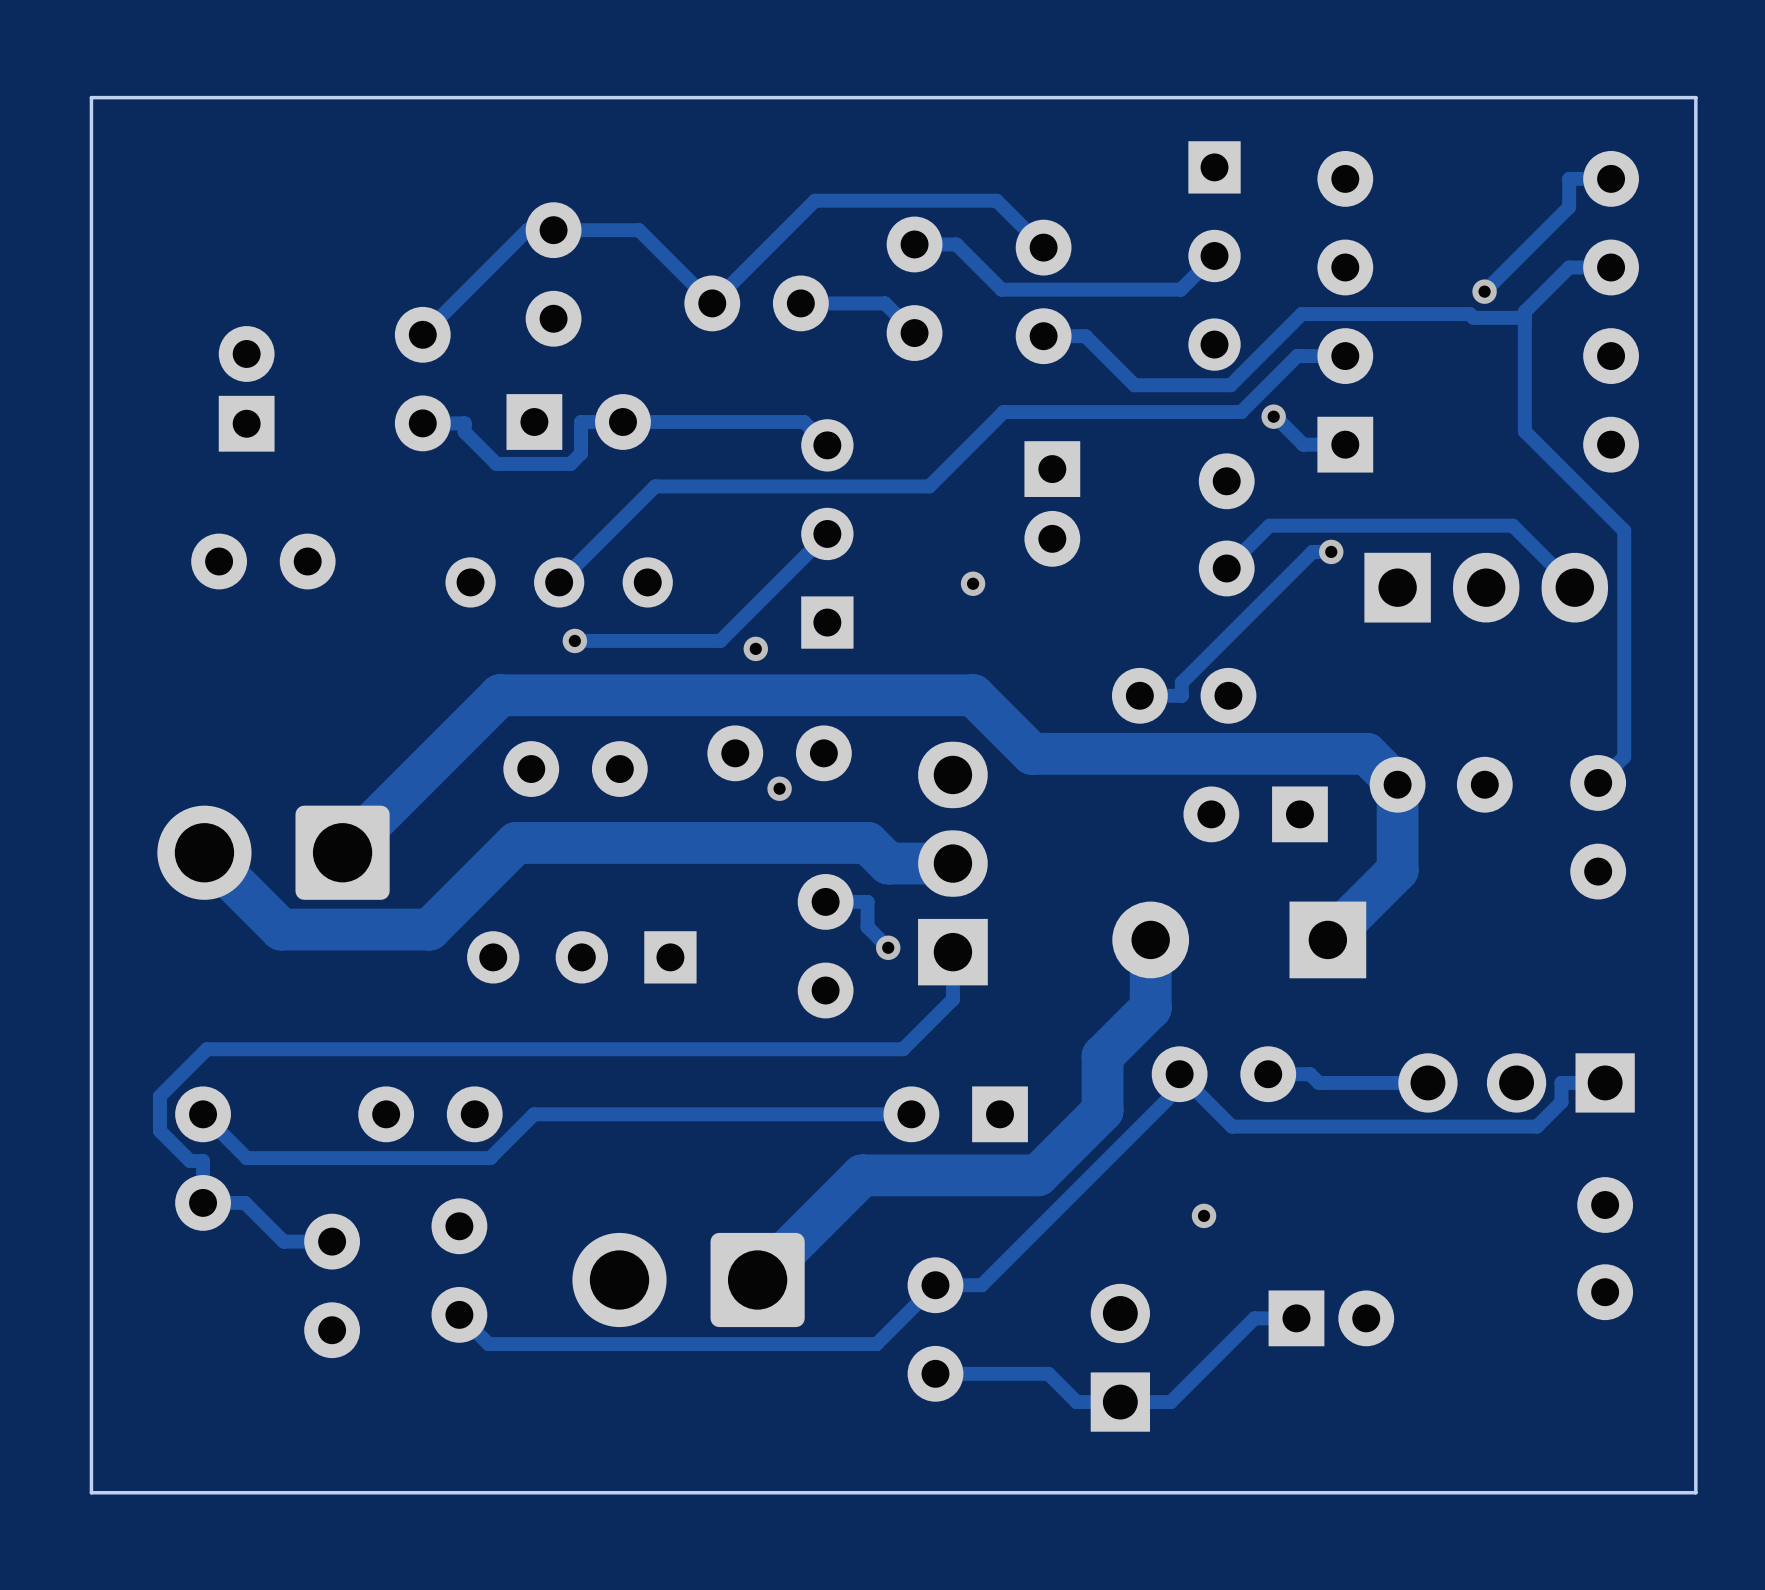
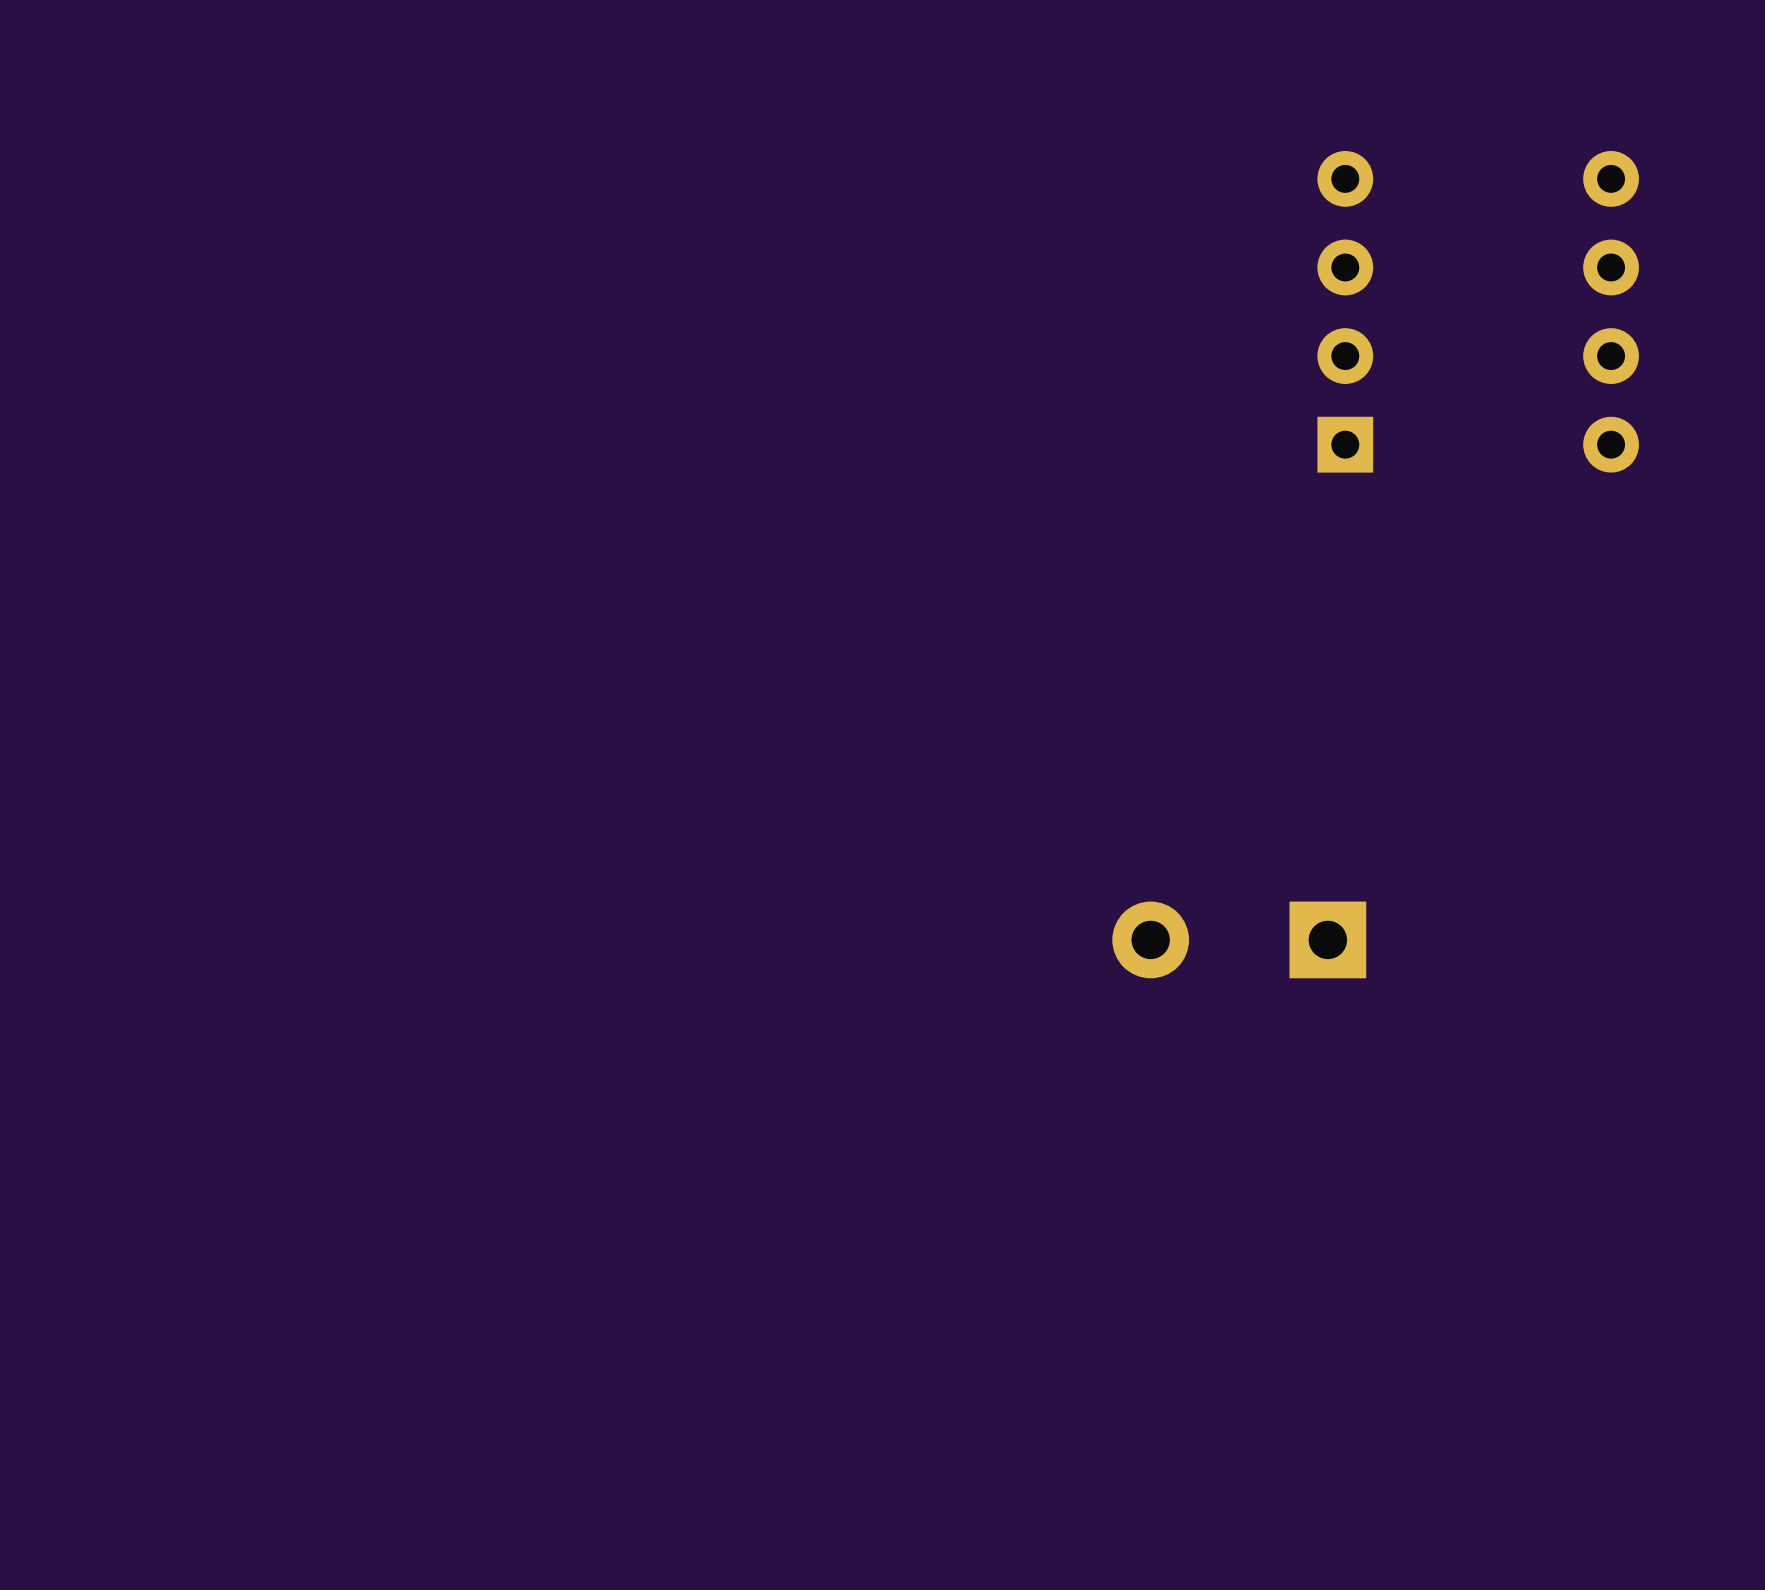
board edge: (1695, 97) (1695, 1492) (91, 1492) (91, 97) (1695, 97) -> none
track: (1611, 178) (1569, 178) (1569, 207) (1484, 291) -> none
track: (914, 244) (956, 244) (1001, 289) (1180, 289) (1214, 255) -> none
track: (1043, 247) (996, 200) (814, 200) (712, 303) (639, 230) (527, 230) (422, 334) -> none
part: (1214, 255) -> none
track: (1611, 267) (1569, 267) (1524, 311) (1524, 431) (1624, 530) (1624, 756) (1598, 782) -> none
part: (553, 274) -> none
part: (914, 288) -> none
part: (1043, 291) -> none
via: (1484, 291) -> none
part: (756, 303) -> none
track: (800, 303) (884, 303) (914, 333) -> none
track: (1524, 317) (1473, 317) (1469, 314) (1301, 314) (1230, 385) (1134, 385) (1085, 336) (1043, 336) -> none
track: (1345, 356) (1297, 356) (1241, 412) (1003, 412) (929, 486) (655, 486) (559, 582) -> none
part: (422, 379) -> none
part: (246, 388) -> none
track: (1273, 416) (1303, 444) (1345, 444) -> none
via: (1273, 416) -> none
part: (578, 422) -> none
track: (422, 423) (464, 423) (464, 432) (496, 463) (570, 463) (581, 453) (581, 422) (804, 422) (827, 445) -> none
part: (1052, 503) -> none
part: (1226, 524) -> none
track: (827, 533) (720, 640) (574, 640) -> none
part: (827, 533) -> none
track: (1331, 551) (1312, 551) (1181, 682) (1181, 695) (1139, 695) -> none
via: (1331, 551) -> none
part: (263, 561) -> none
track: (1226, 568) (1269, 525) (1512, 525) (1574, 587) -> none
part: (559, 582) -> none
via: (973, 583) -> none
part: (1486, 587) -> none
via: (574, 640) -> none
via: (755, 648) -> none
part: (1184, 695) -> none
part: (779, 753) -> none
part: (575, 769) -> none
part: (1441, 784) -> none
via: (779, 788) -> none
part: (1255, 814) -> none
part: (1598, 827) -> none
track: (204, 852) (281, 929) (429, 929) (516, 842) (867, 842) (888, 863) (952, 863) -> none
part: (273, 852) -> none
track: (342, 852) (500, 695) (973, 695) (1031, 753) (1366, 753) (1397, 784) (1397, 870) (1327, 939) -> none
part: (952, 863) -> none
track: (825, 901) (867, 901) (867, 927) (888, 947) -> none
track: (1150, 939) (1150, 1008) (1102, 1056) (1102, 1110) (1037, 1175) (862, 1175) (757, 1279) -> none
part: (825, 946) -> none
via: (888, 947) -> none
track: (952, 952) (952, 999) (903, 1049) (206, 1049) (159, 1096) (159, 1130) (190, 1160) (203, 1160) (203, 1202) (244, 1202) (283, 1241) (332, 1241) -> none
part: (581, 957) -> none
track: (1179, 1074) (1232, 1126) (1536, 1126) (1561, 1102) (1561, 1082) (1605, 1082) -> none
part: (1223, 1074) -> none
track: (1268, 1074) (1310, 1074) (1318, 1082) (1427, 1082) -> none
track: (1186, 1080) (981, 1285) (935, 1285) (876, 1344) (488, 1344) (459, 1314) -> none
part: (1516, 1082) -> none
part: (430, 1114) -> none
track: (911, 1114) (534, 1114) (490, 1158) (246, 1158) (203, 1114) -> none
part: (955, 1114) -> none
part: (203, 1158) -> none
via: (1204, 1215) -> none
part: (1605, 1248) -> none
part: (459, 1270) -> none
part: (688, 1279) -> none
part: (332, 1285) -> none
track: (1296, 1318) (1254, 1318) (1170, 1402) (1076, 1402) (1048, 1373) (935, 1373) -> none
part: (1331, 1318) -> none
part: (935, 1329) -> none
part: (1120, 1357) -> none

